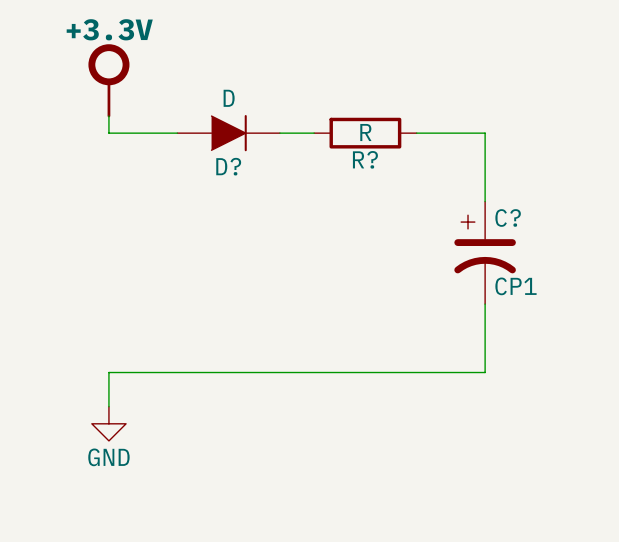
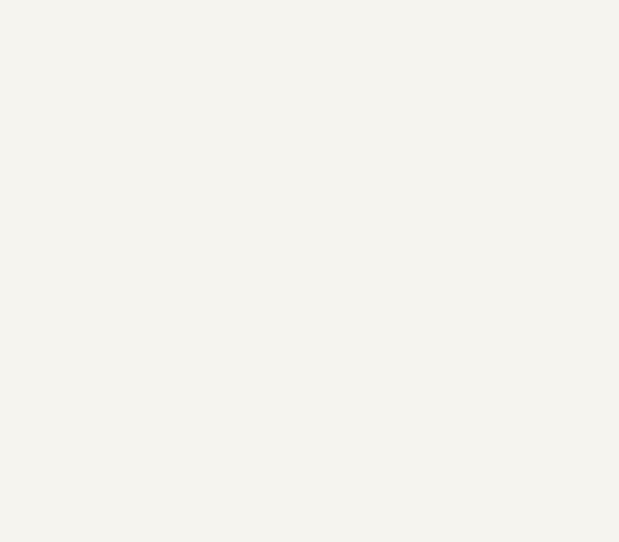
power symbol: (108, 80) -> none
wire: (108, 116) (108, 133) (177, 133) -> none
D?: D (228, 133) -> none
wire: (279, 133) (314, 133) -> none
R?: R (365, 133) -> none
wire: (416, 133) (485, 133) (485, 201) -> none
C?: CP1 (485, 252) -> none
wire: (485, 304) (485, 372) (108, 372) (108, 406) -> none
power symbol: GND (108, 423) -> none

